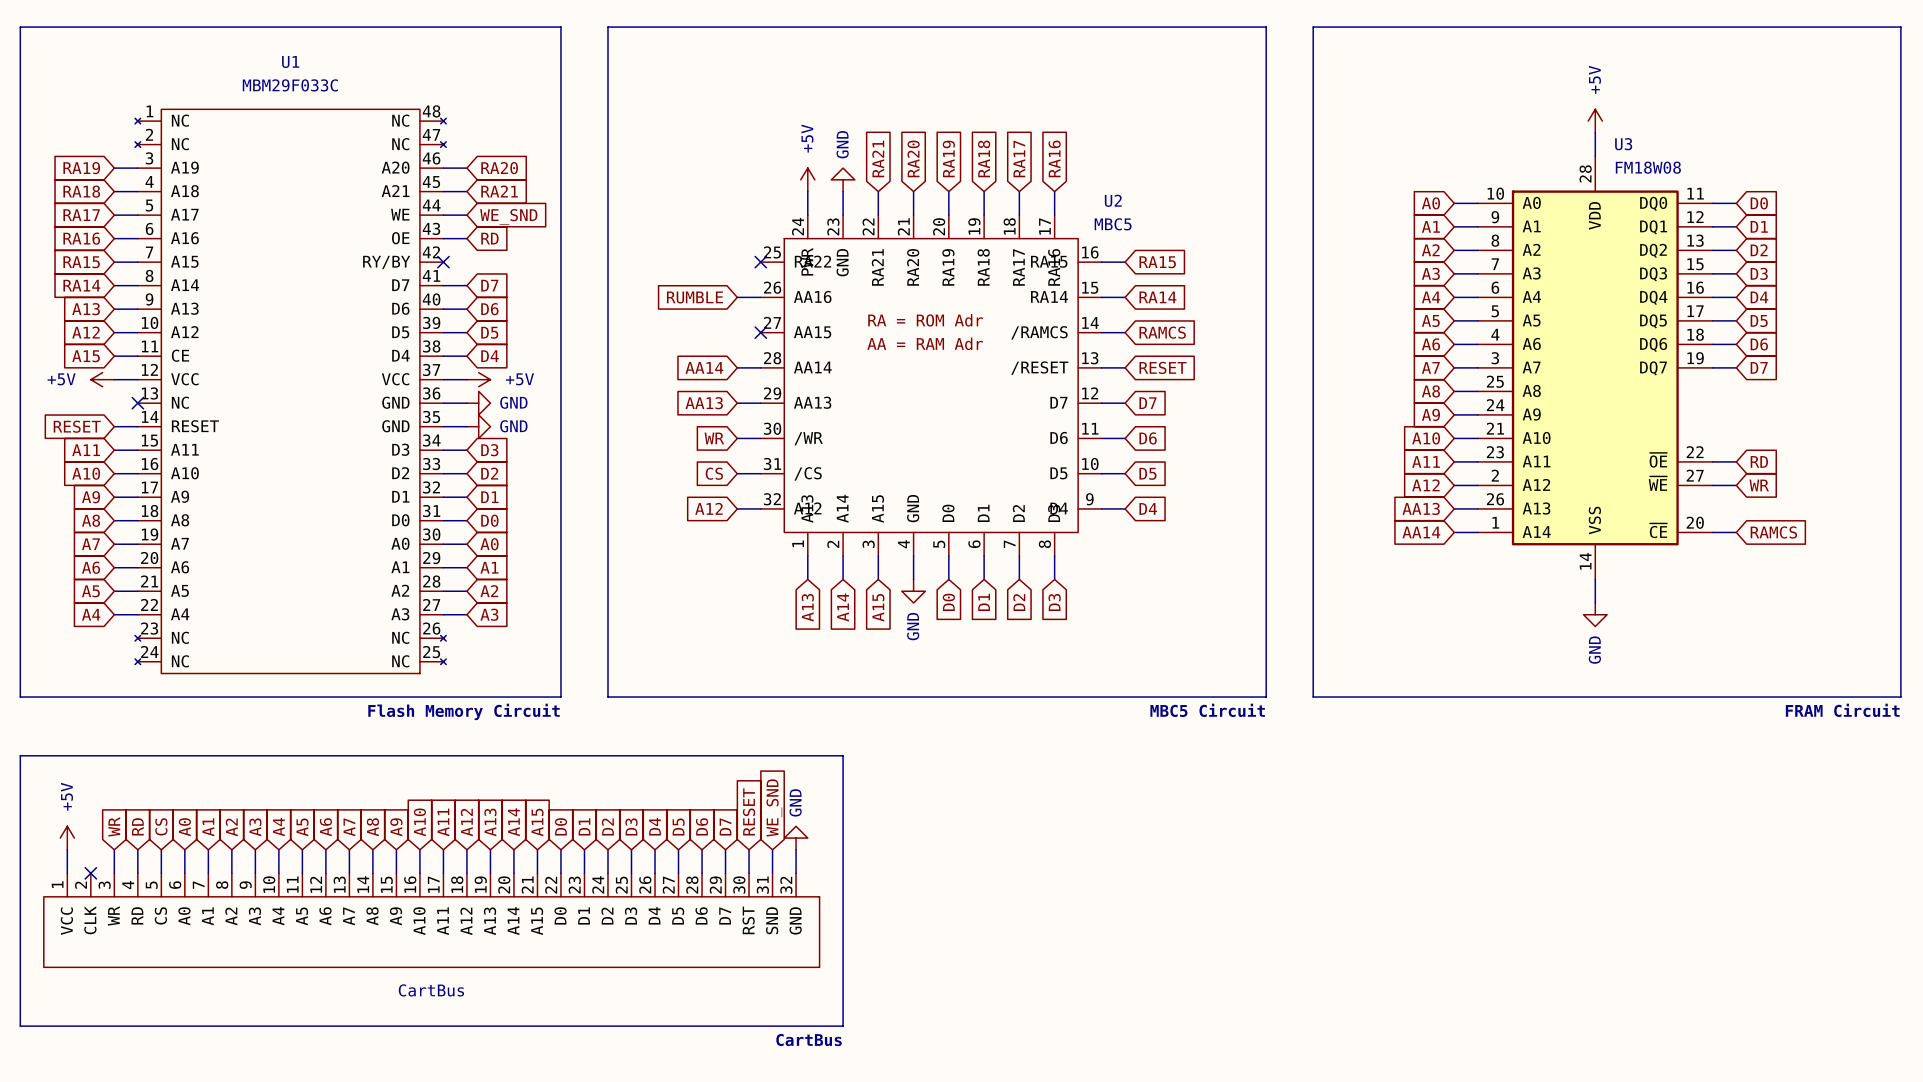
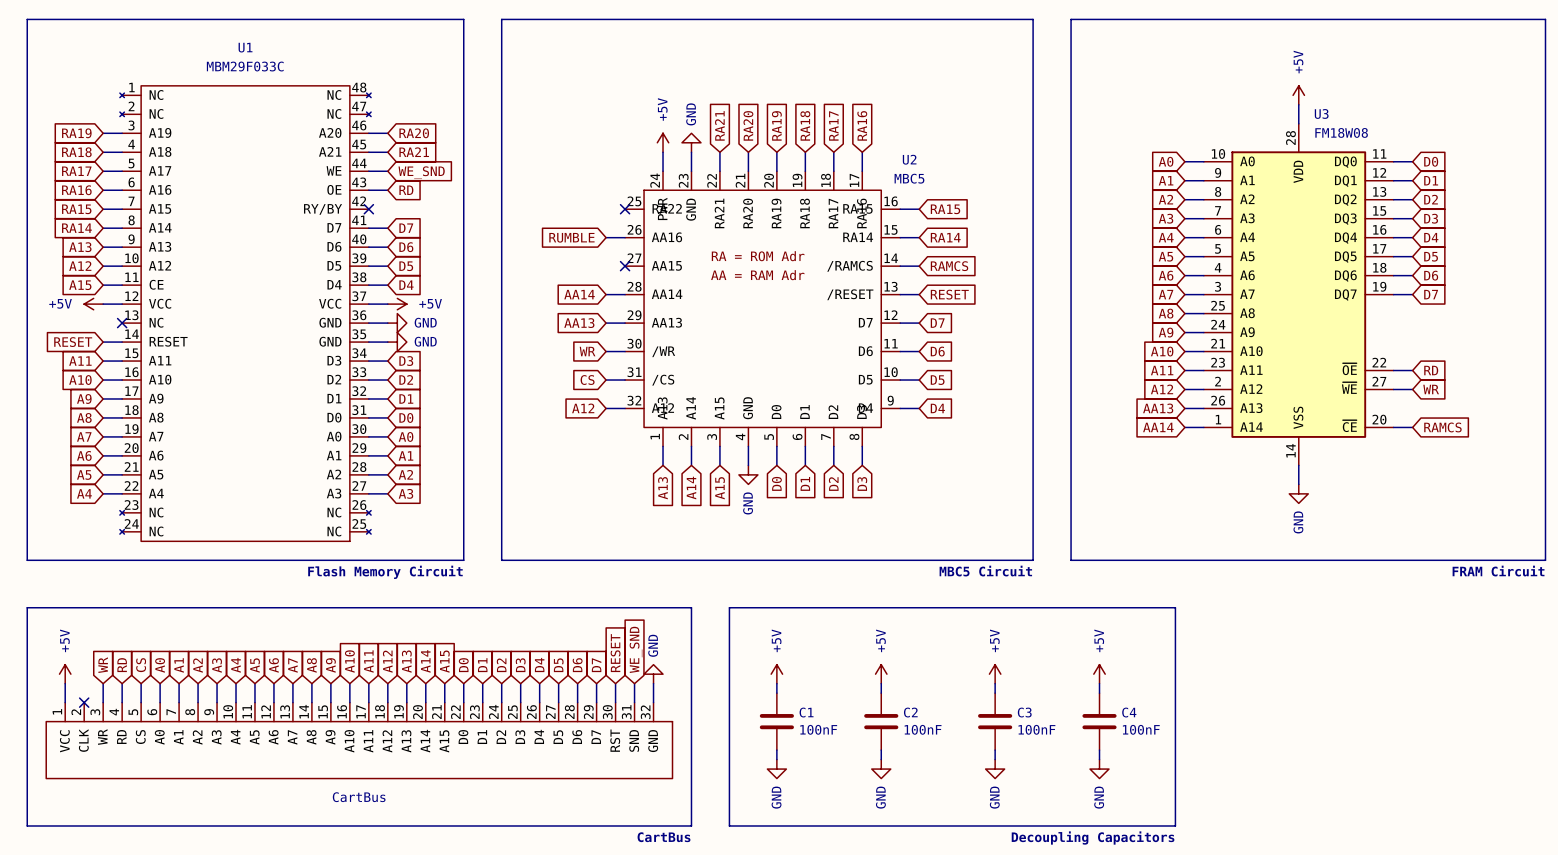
line: none -> (729, 607) (729, 825) (1175, 825) (1175, 607) (729, 607)
power symbol: none -> +5V (776, 674)
power symbol: none -> +5V (881, 674)
power symbol: none -> +5V (995, 674)
power symbol: none -> +5V (1099, 674)
wire: none -> (776, 683) (776, 693)
wire: none -> (881, 683) (881, 693)
wire: none -> (995, 683) (995, 693)
wire: none -> (1099, 683) (1099, 693)
C1: none -> 100nF (776, 721)
C2: none -> 100nF (881, 721)
C3: none -> 100nF (995, 721)
C4: none -> 100nF (1099, 721)
wire: none -> (776, 750) (776, 759)
wire: none -> (881, 750) (881, 759)
wire: none -> (995, 750) (995, 759)
wire: none -> (1099, 750) (1099, 759)
power symbol: none -> GND (776, 769)
power symbol: none -> GND (881, 769)
power symbol: none -> GND (995, 769)
power symbol: none -> GND (1099, 769)
text: none -> Decoupling Capacitors (1093, 838)

